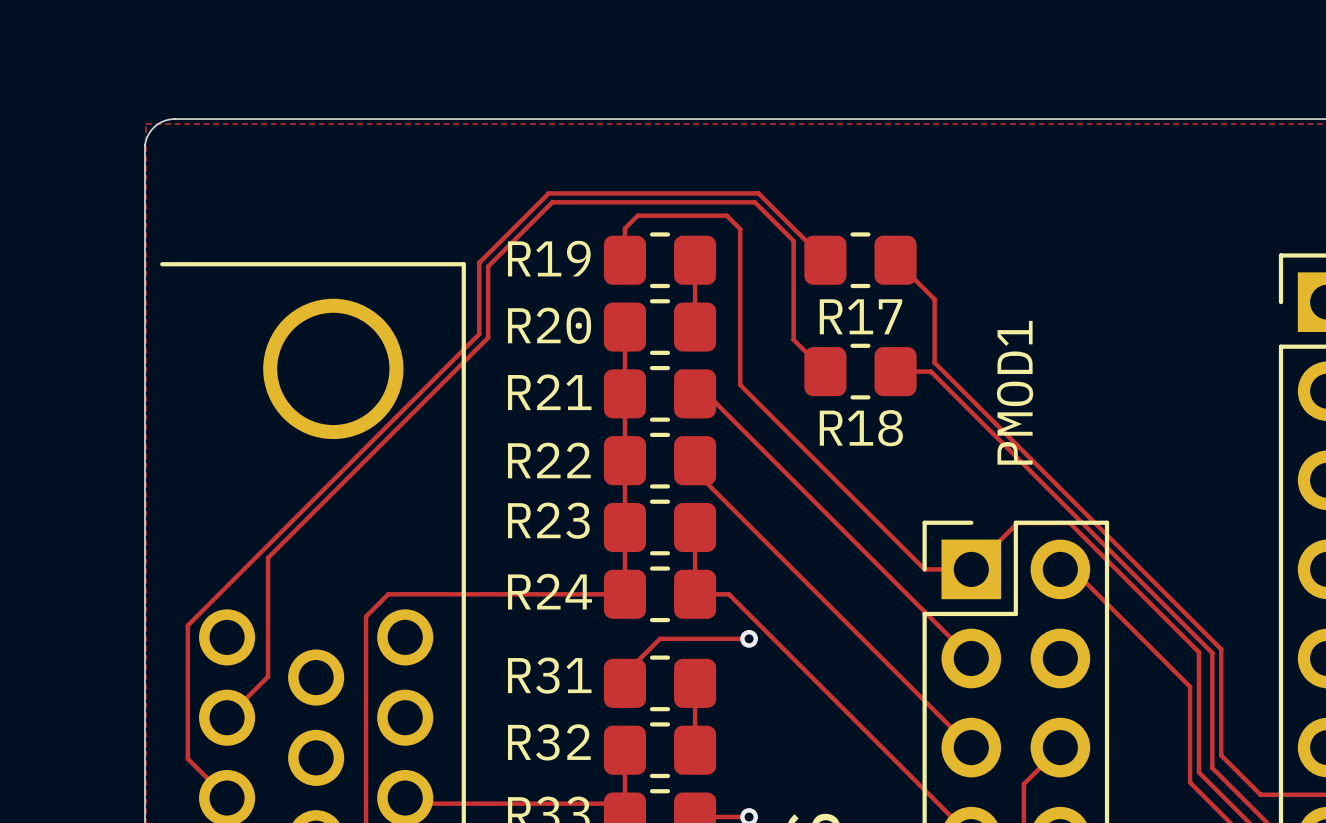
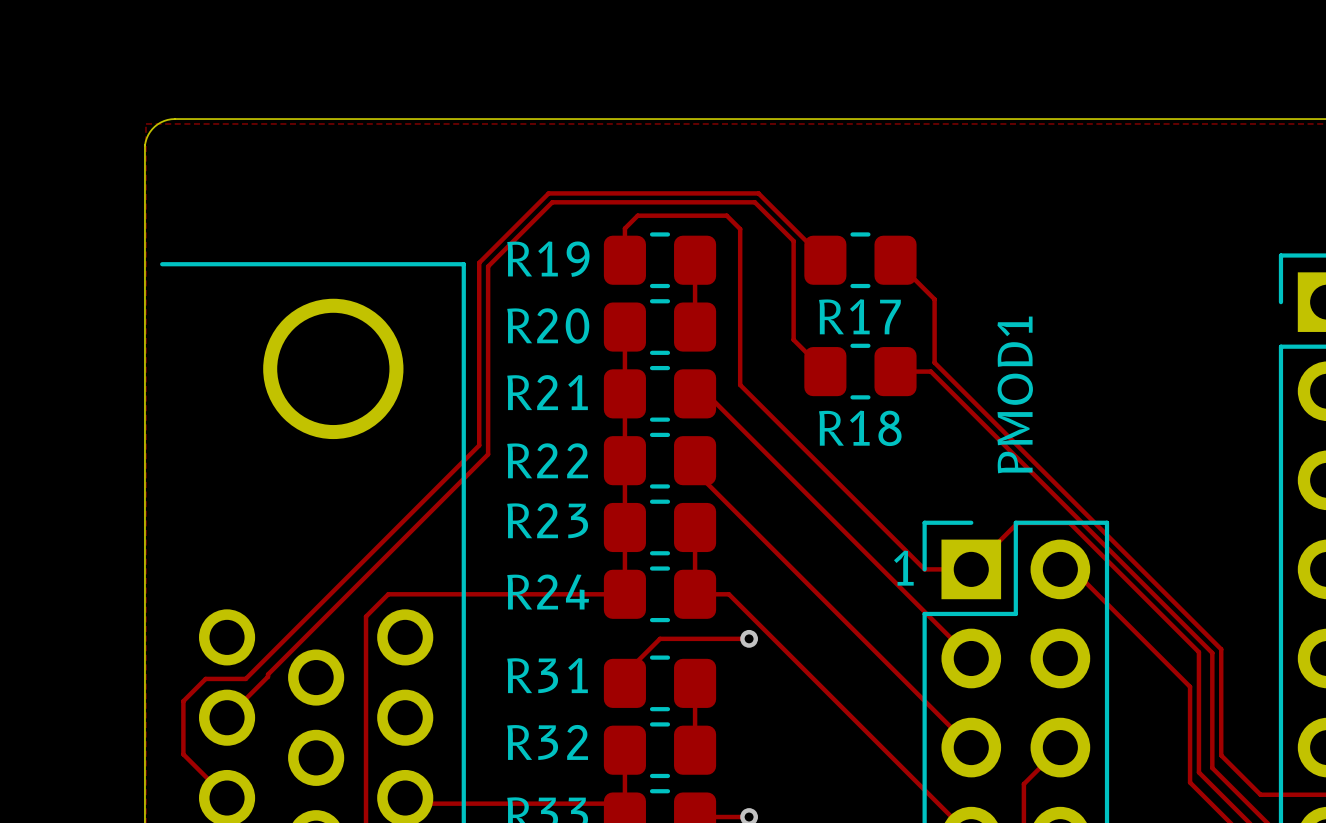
track: (479, 334) (187, 625) (187, 758) -> (479, 334) (479, 445) (245, 678) (205, 678) (183, 701) (183, 754) (187, 758)
track: (488, 337) (268, 557) (268, 674) -> (488, 337) (488, 454) (268, 674)
text: none -> 1 (903, 568)

